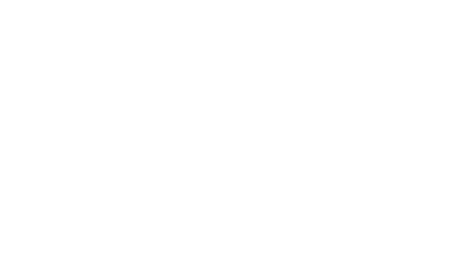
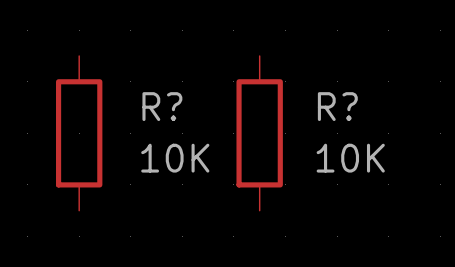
R?: none -> 10K (79, 133)
R?: none -> 10K (259, 133)

